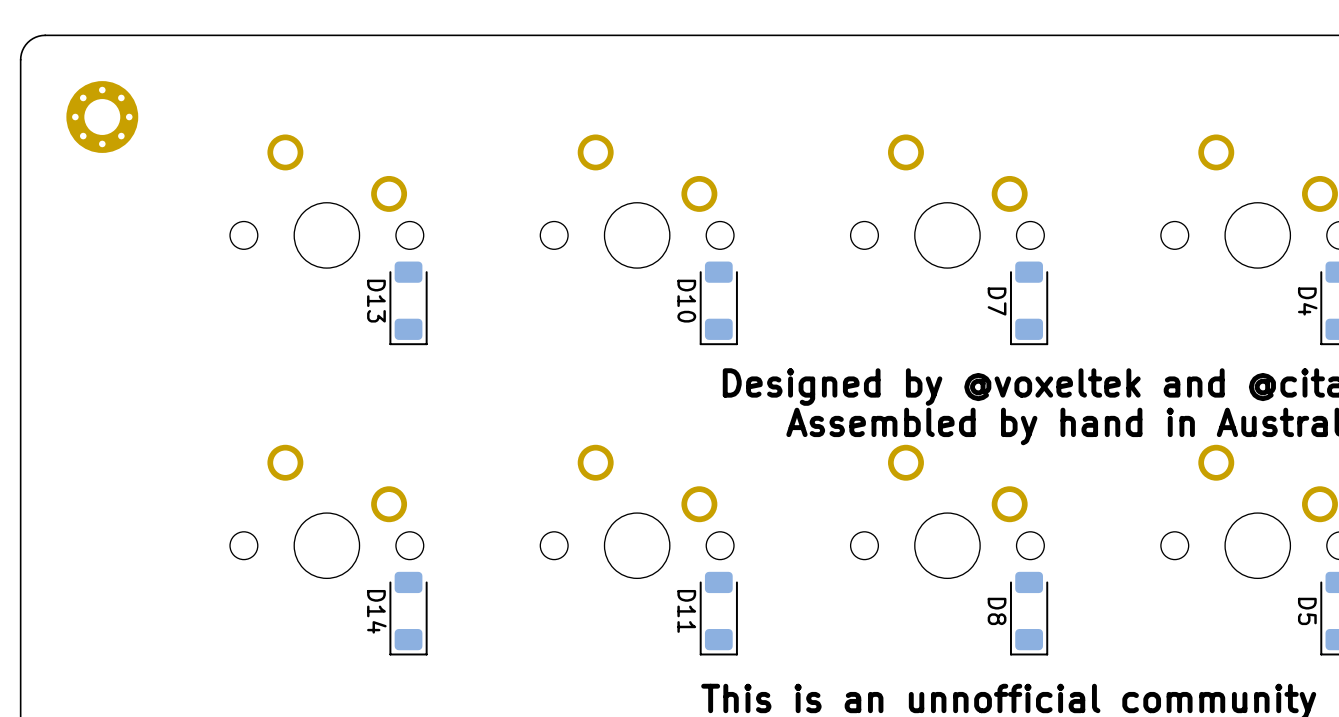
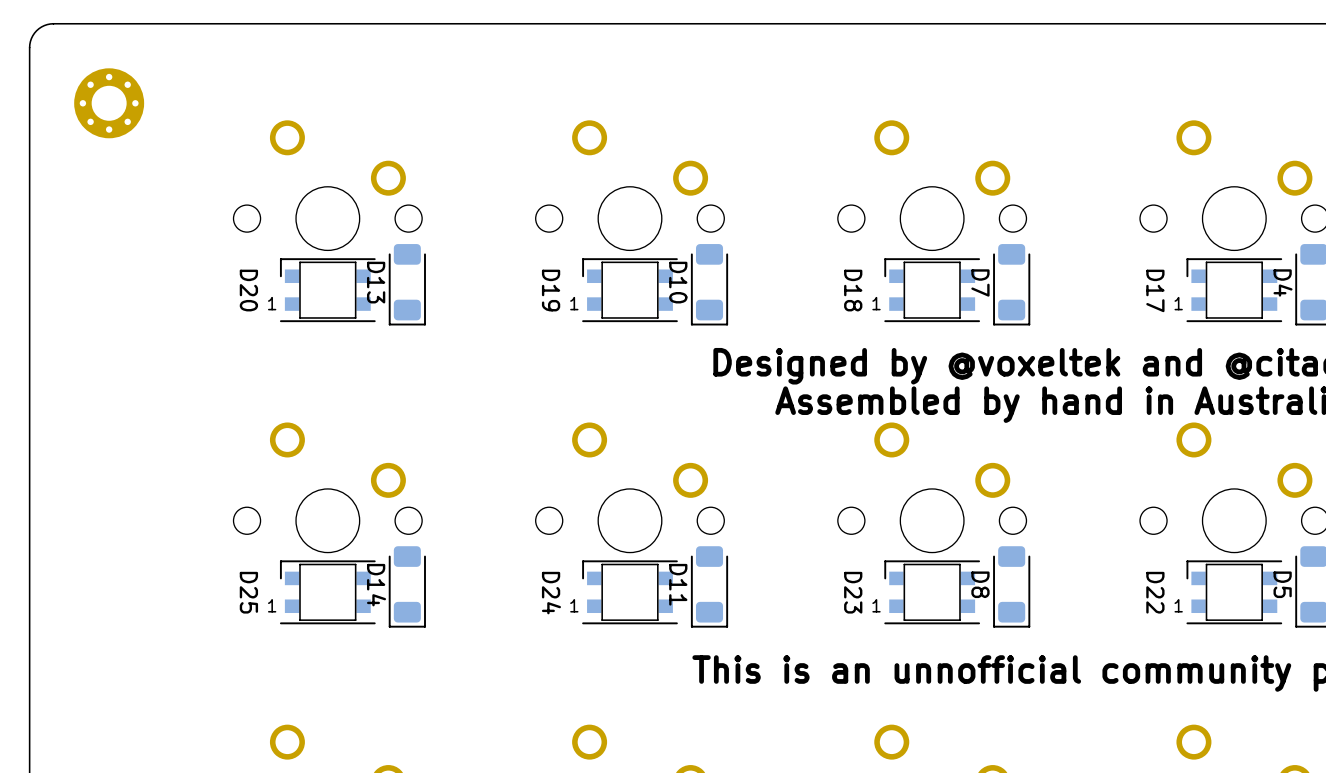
D20: none -> (327, 290)
D19: none -> (629, 290)
D18: none -> (932, 290)
D17: none -> (1234, 290)
D25: none -> (327, 592)
D24: none -> (629, 592)
D23: none -> (932, 592)
D22: none -> (1234, 592)

